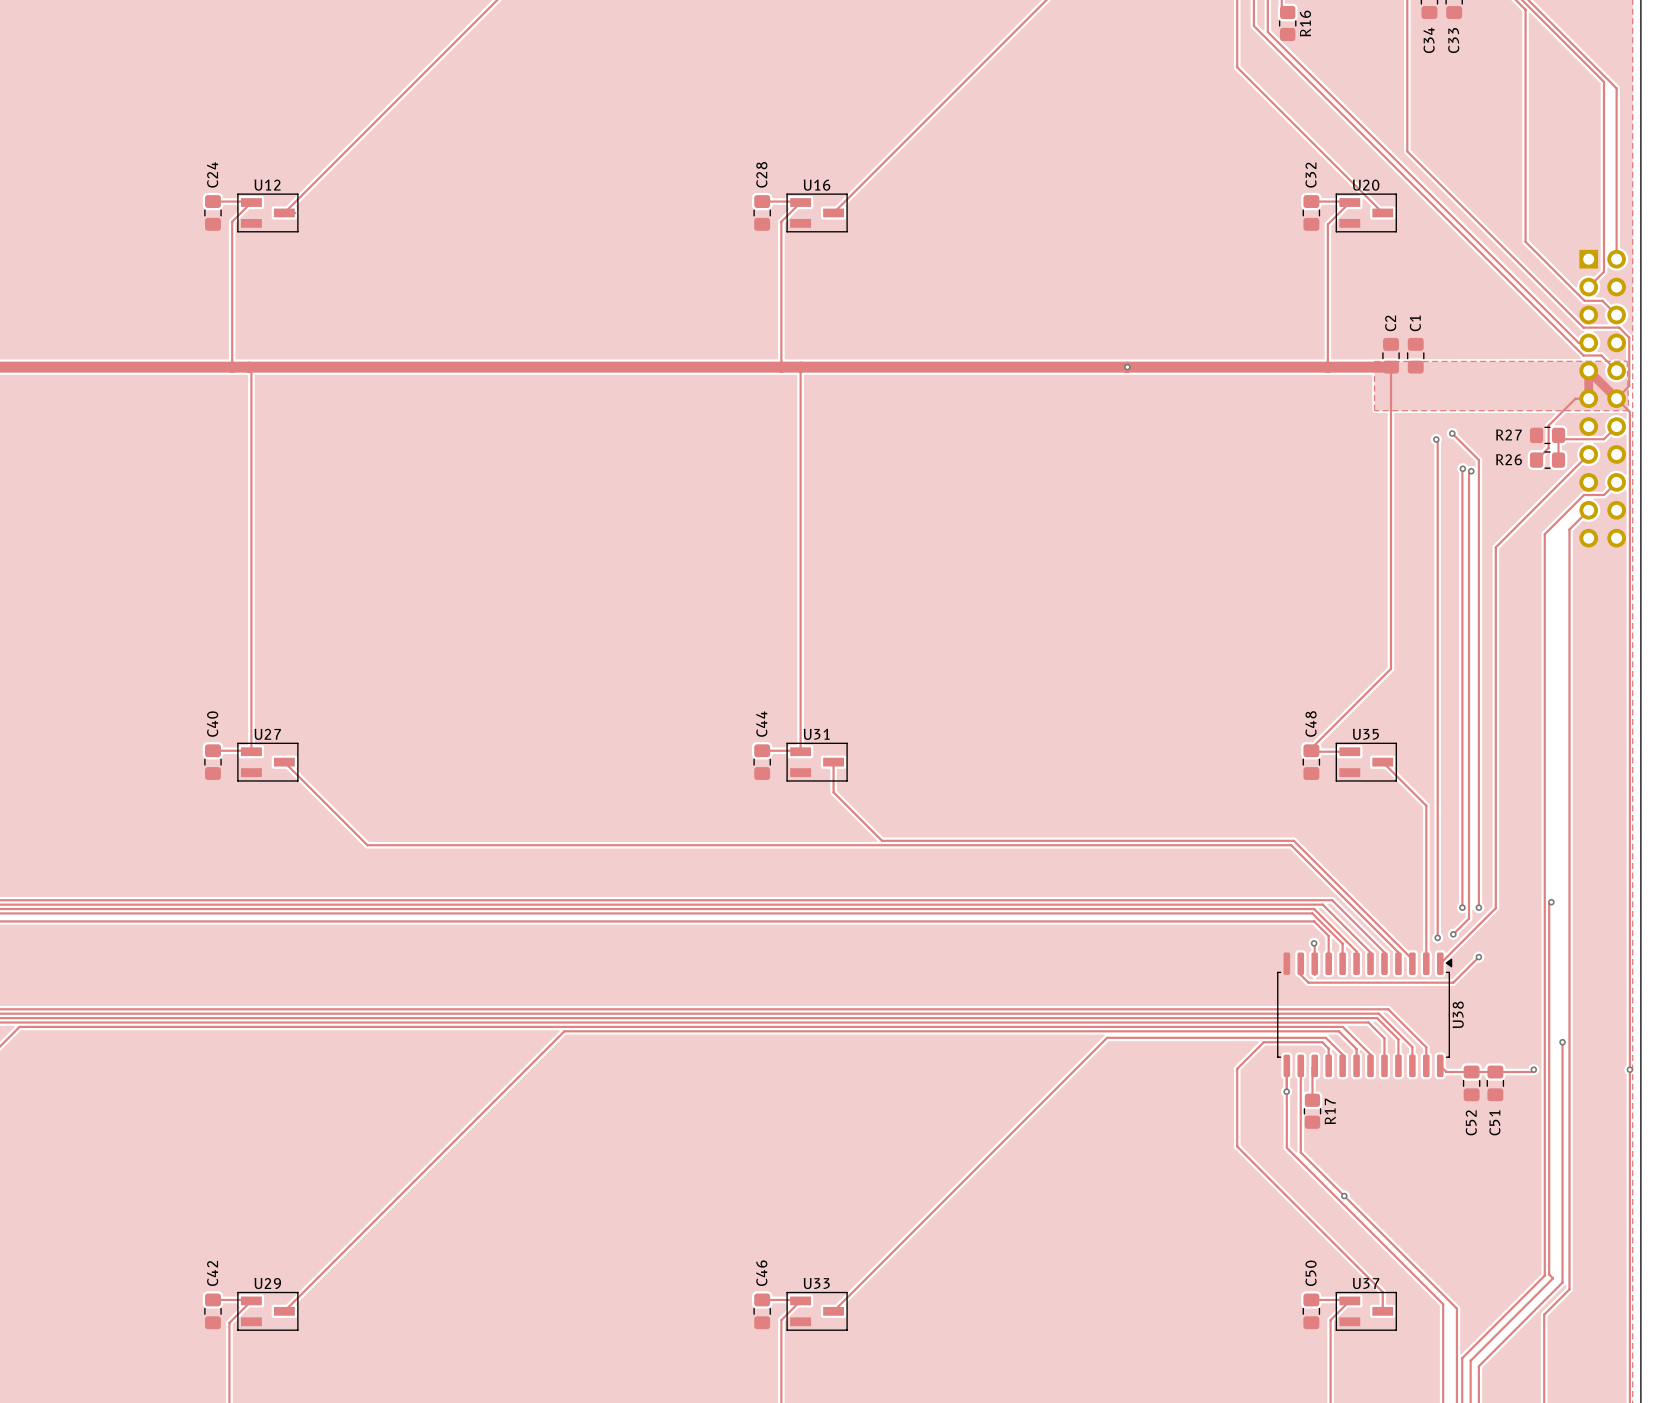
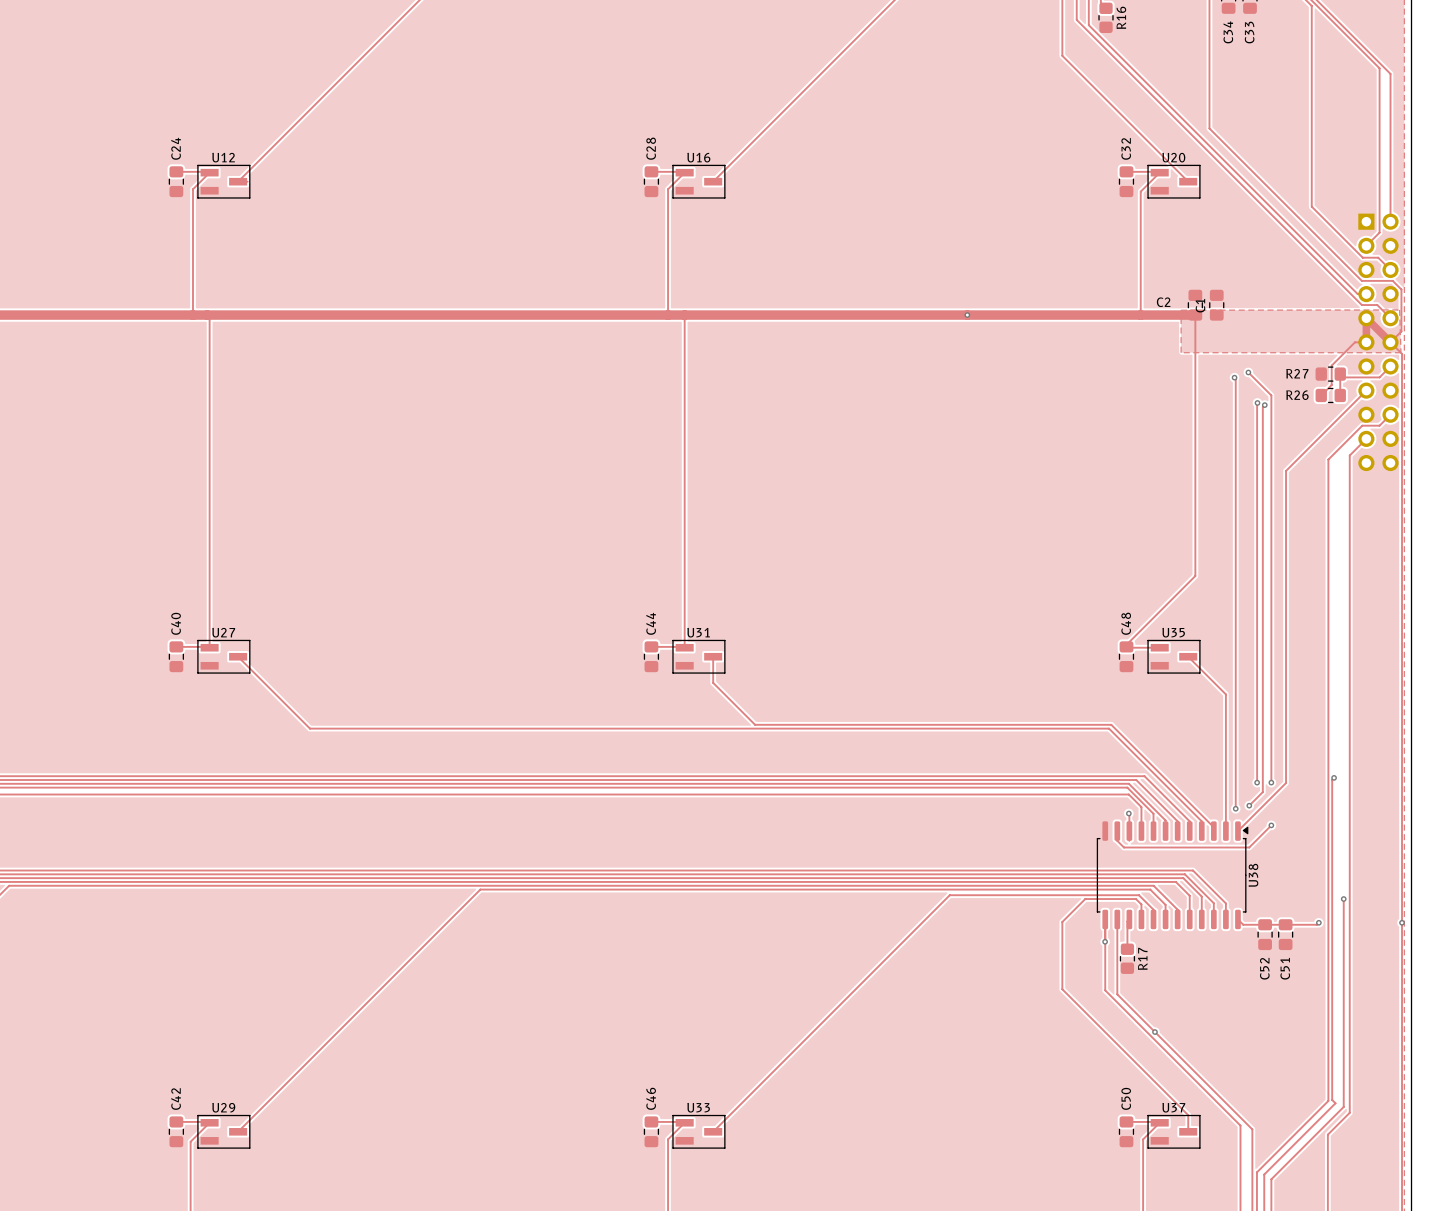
C2 name rotation: 0° (1390, 323) -> 90° clockwise (1163, 302)
C2 name position: C2 (1390, 323) -> C2 (1163, 302)
C1 name position: C1 (1415, 323) -> C1 (1200, 305)

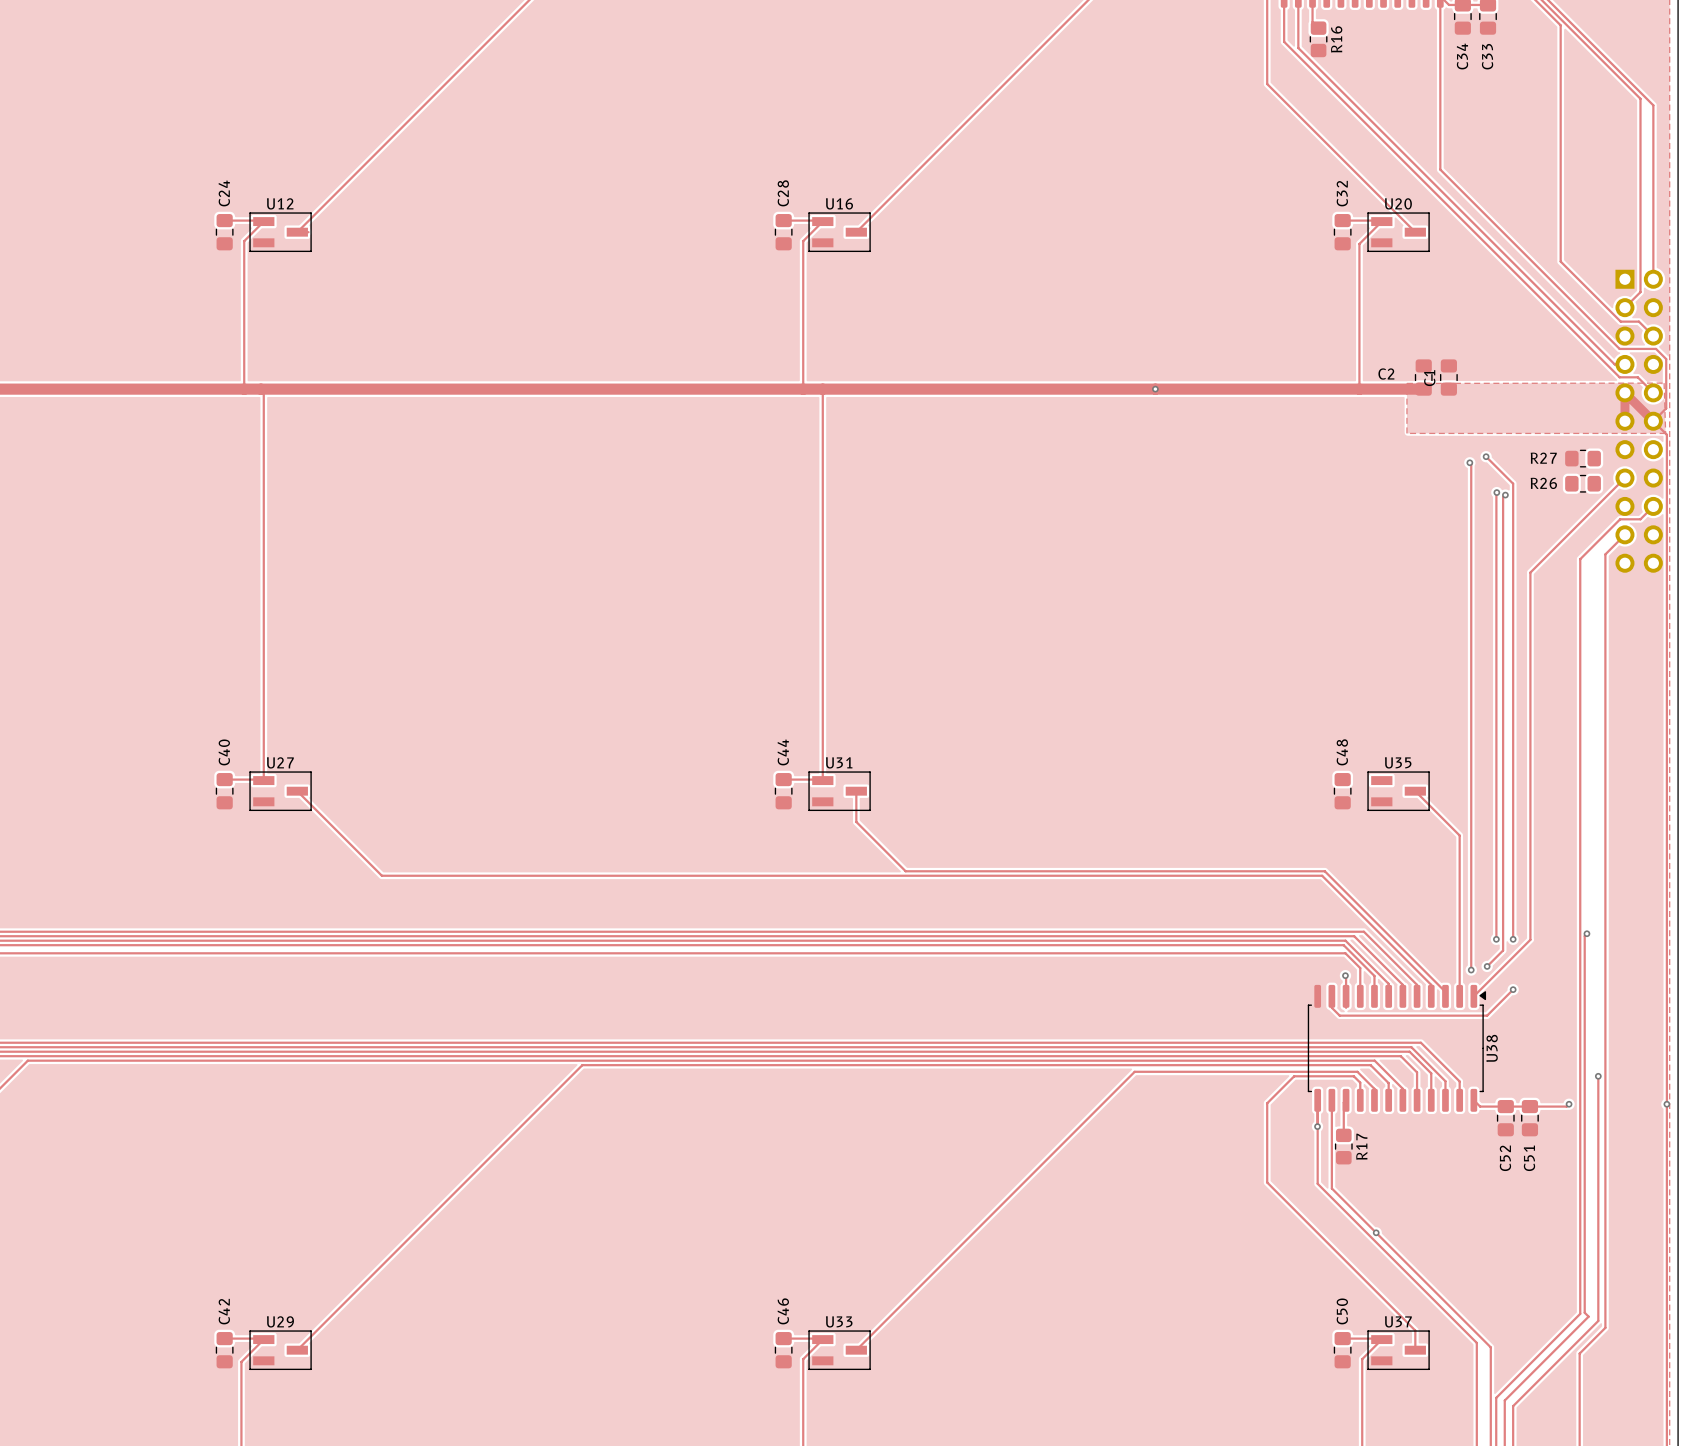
track: (1195, 315) (1195, 575) (1126, 644) (1127, 647) (1159, 647) -> none
track: (1366, 342) (1354, 342) (1331, 365) (1331, 385) (1321, 395) -> none
track: (1390, 366) (1379, 377) (1343, 377) (1340, 374) (1340, 395) -> none

